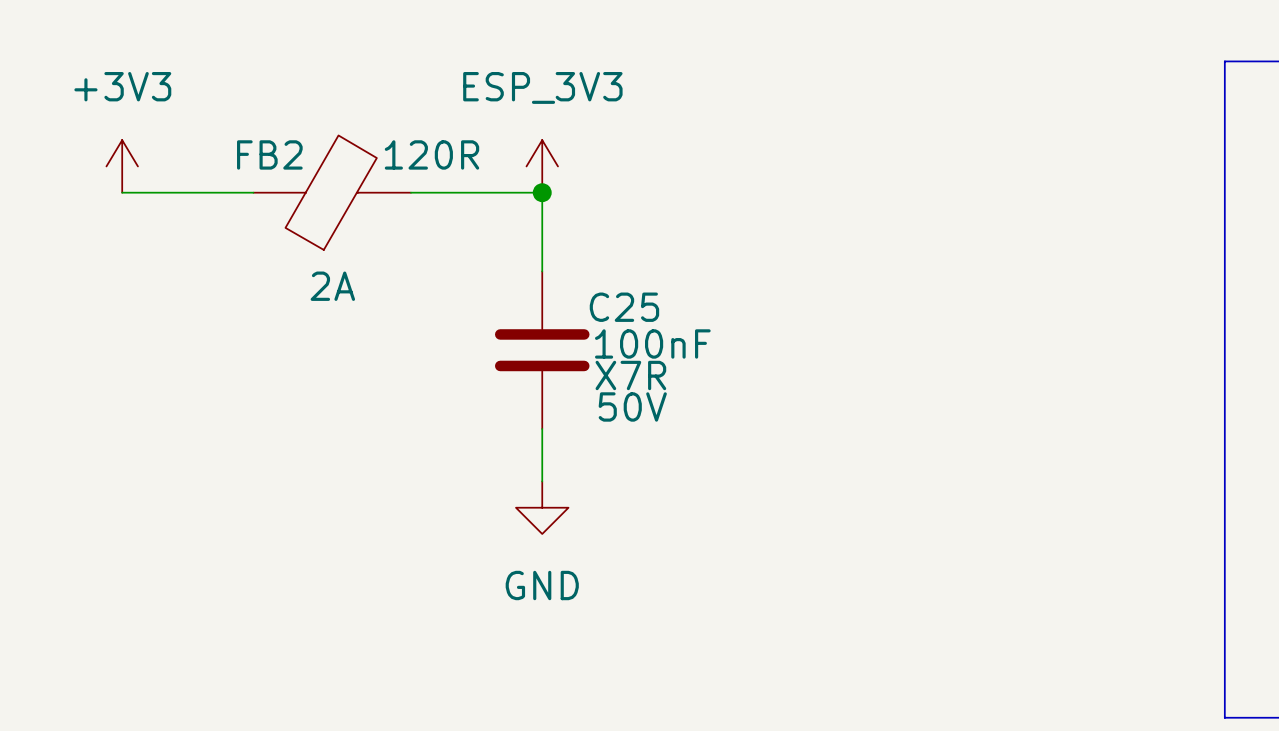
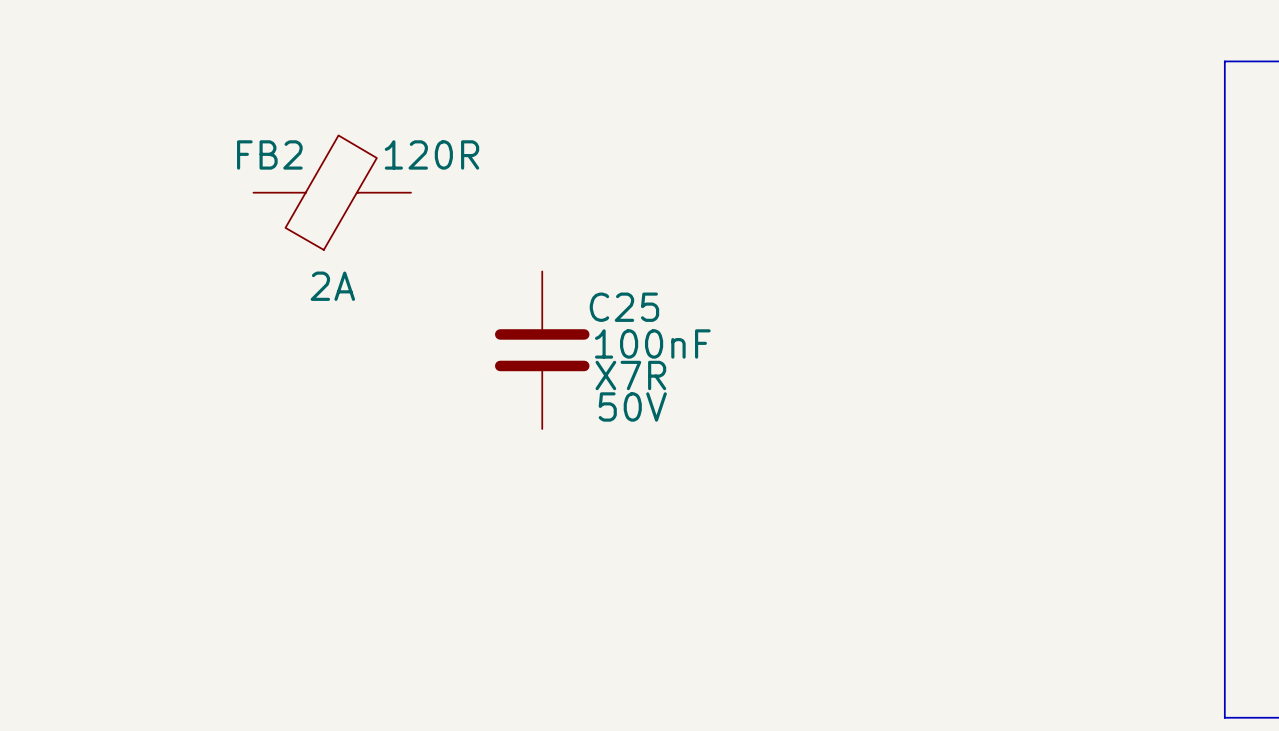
power symbol: +3V3 (122, 166) -> none
power symbol: ESP_3V3 (542, 166) -> none
wire: (122, 192) (253, 192) -> none
wire: (410, 192) (542, 192) (542, 271) -> none
junction: (542, 192) -> none
wire: (542, 428) (542, 481) -> none
power symbol: GND (542, 507) -> none

